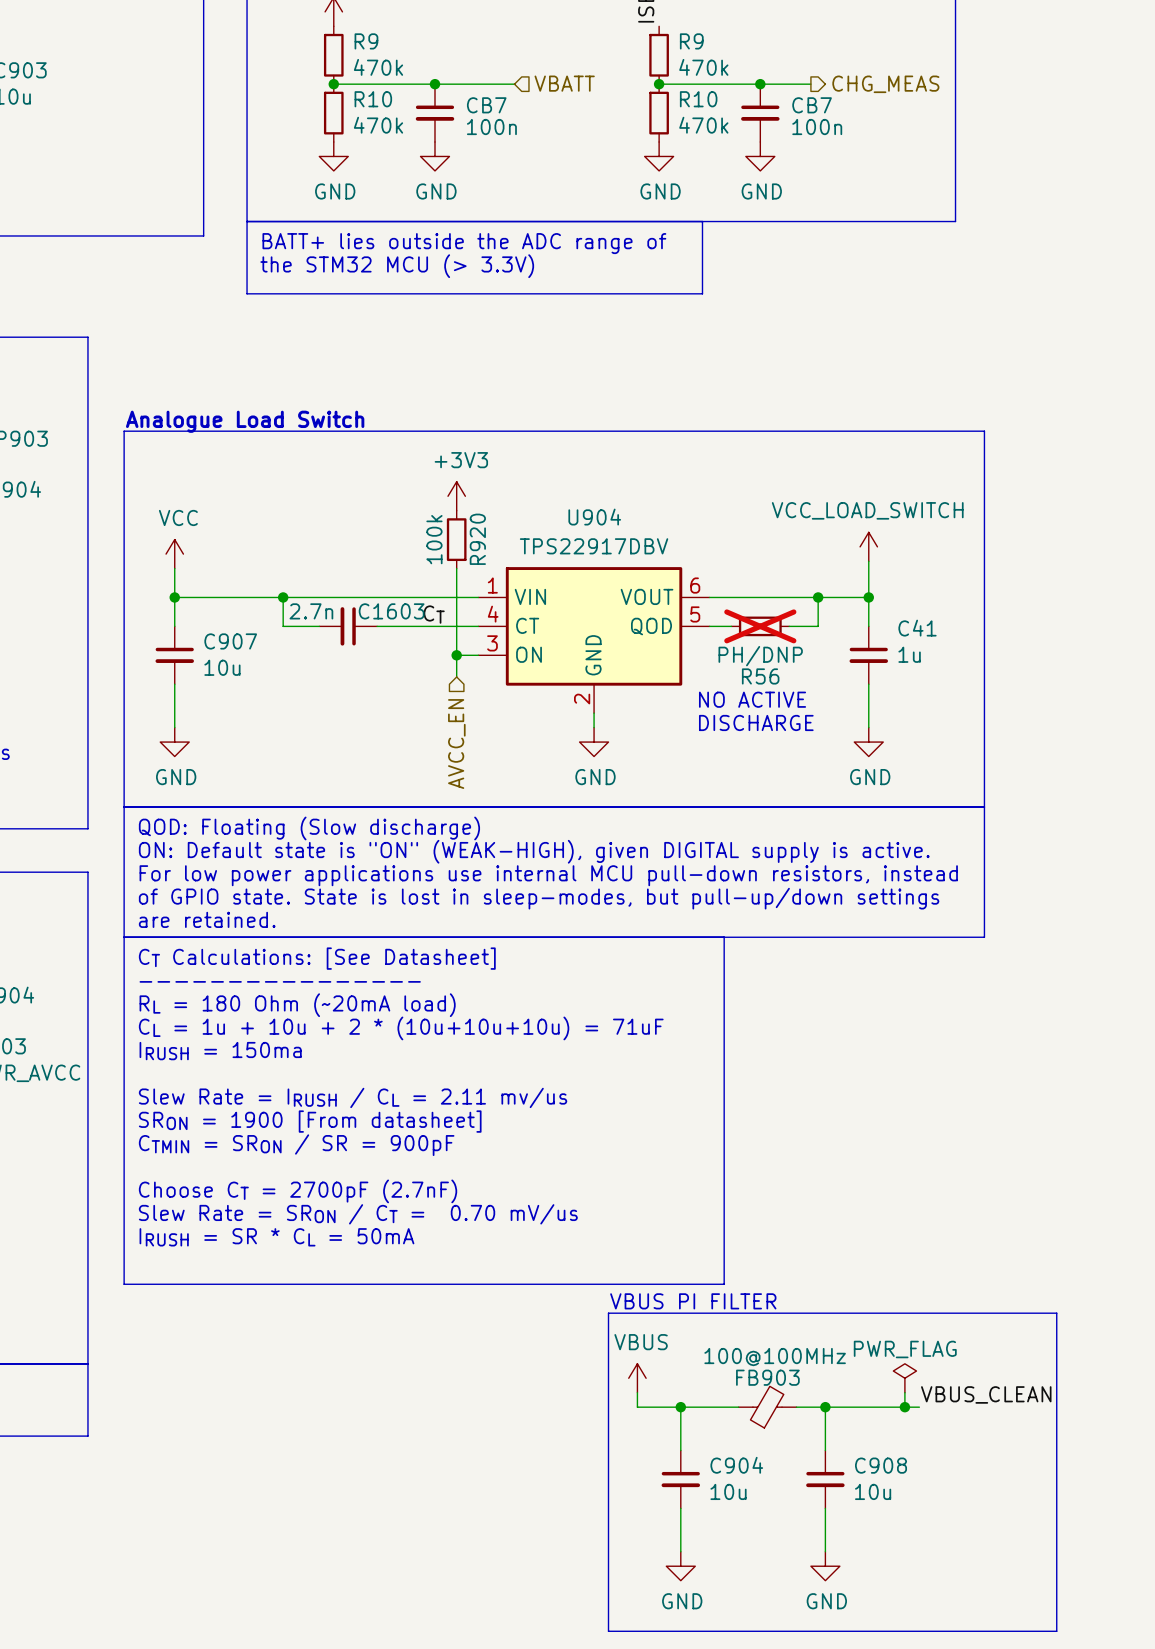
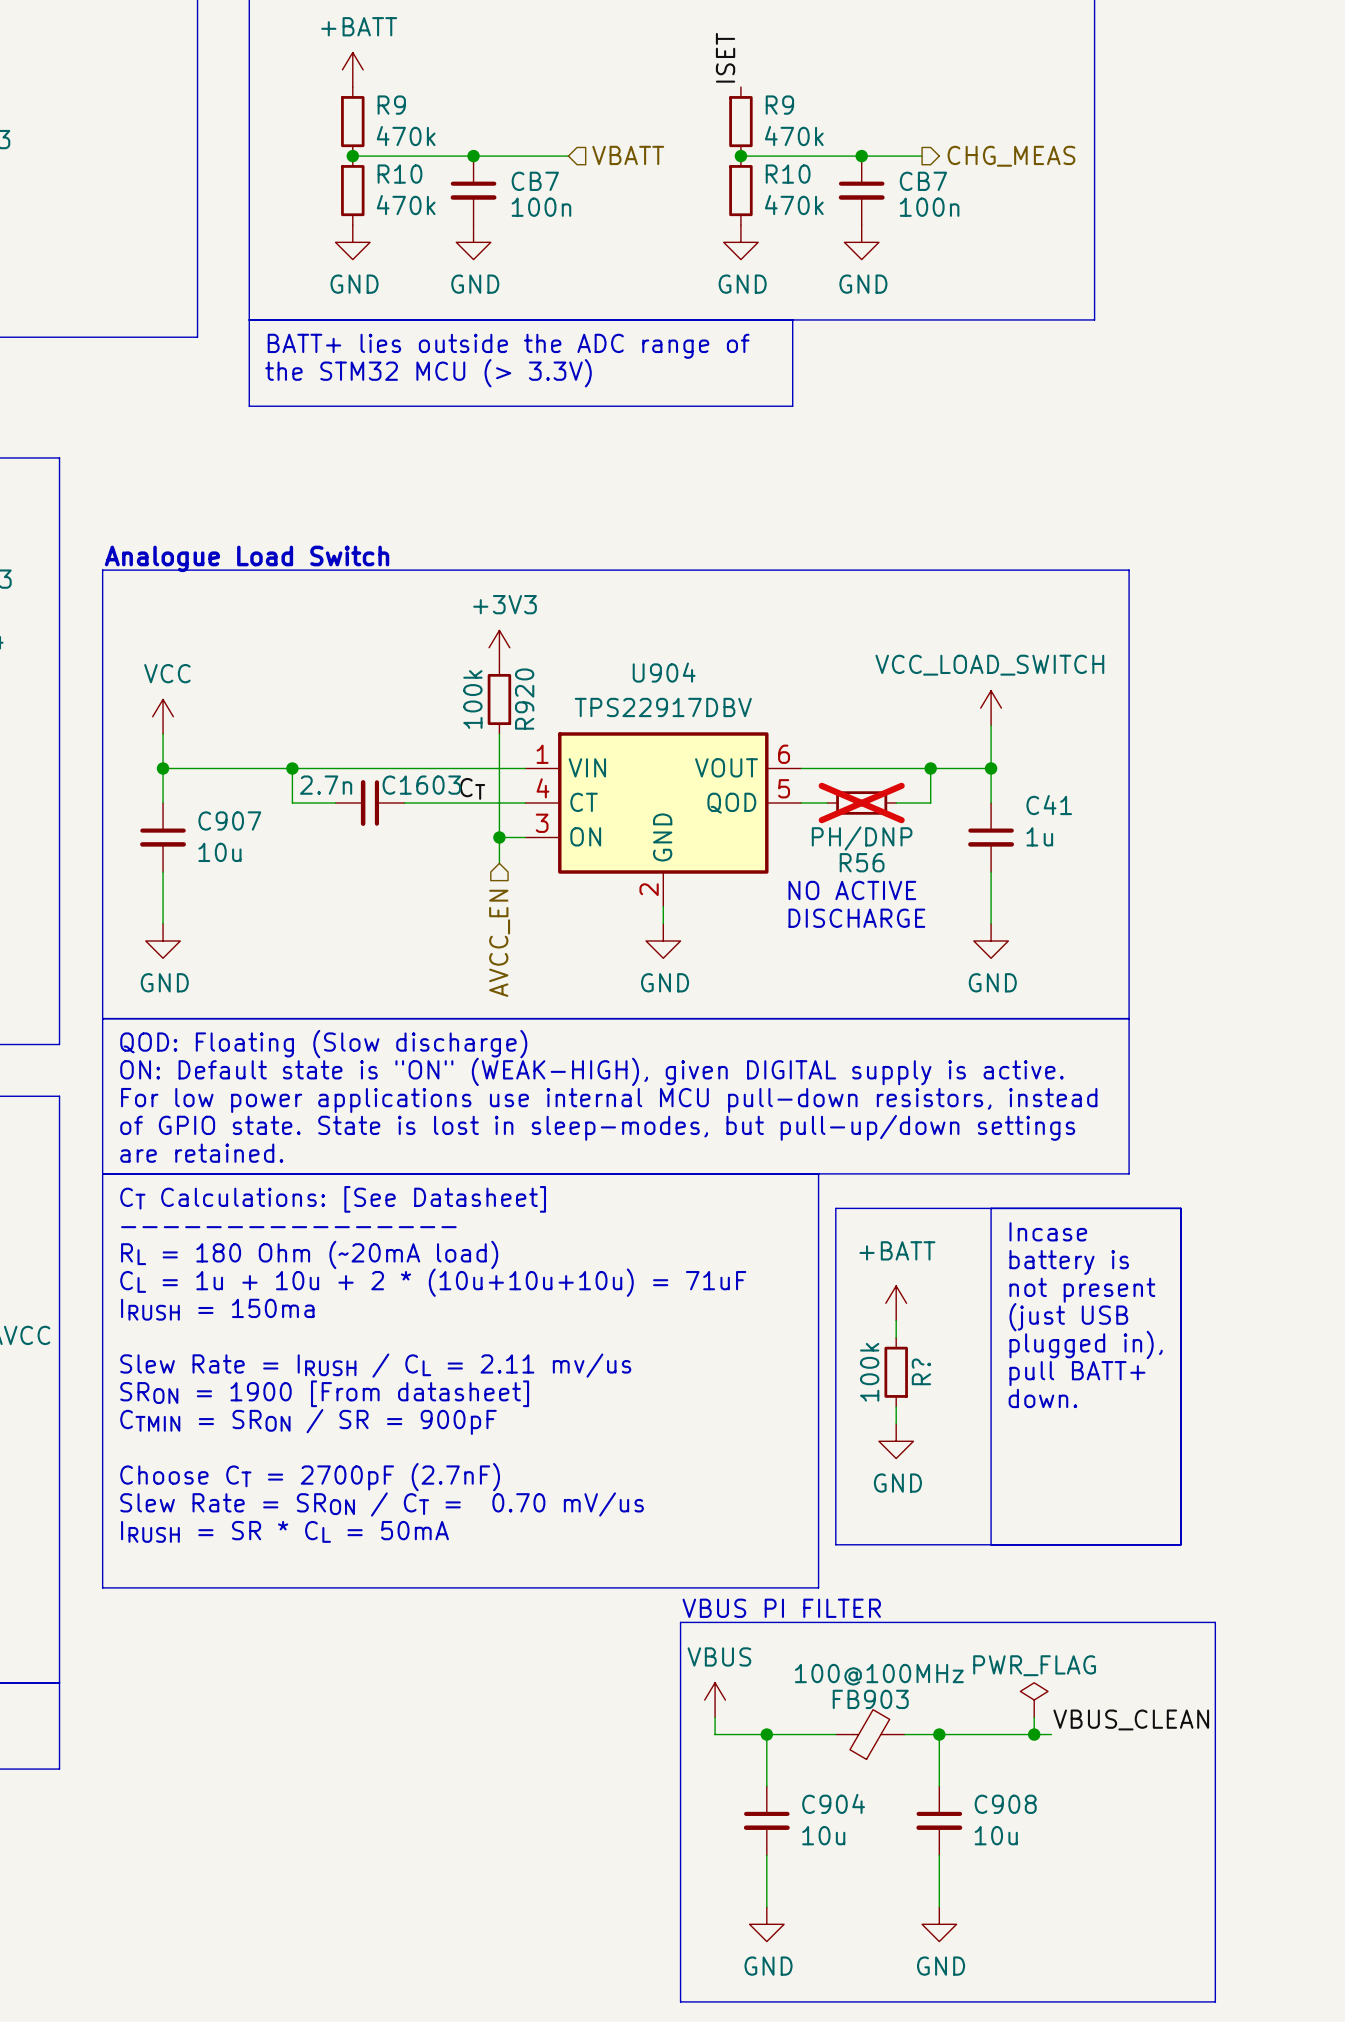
line: none -> (835, 1208) (1180, 1208) (1180, 1544) (835, 1544) (835, 1208)
line: none -> (991, 1208) (991, 1544)
text: none -> Incase (1048, 1231)
text: none -> battery is (1069, 1262)
text: none -> not present (1082, 1290)
power symbol: none -> +BATT (896, 1303)
text: none -> (just USB (1068, 1317)
wire: none -> (896, 1320) (896, 1337)
text: none -> plugged in), (1086, 1344)
R?: none -> 100k (896, 1372)
text: none -> pull BATT+ (1077, 1373)
text: none -> down. (1042, 1398)
wire: none -> (896, 1406) (896, 1424)
power symbol: none -> GND (896, 1441)

